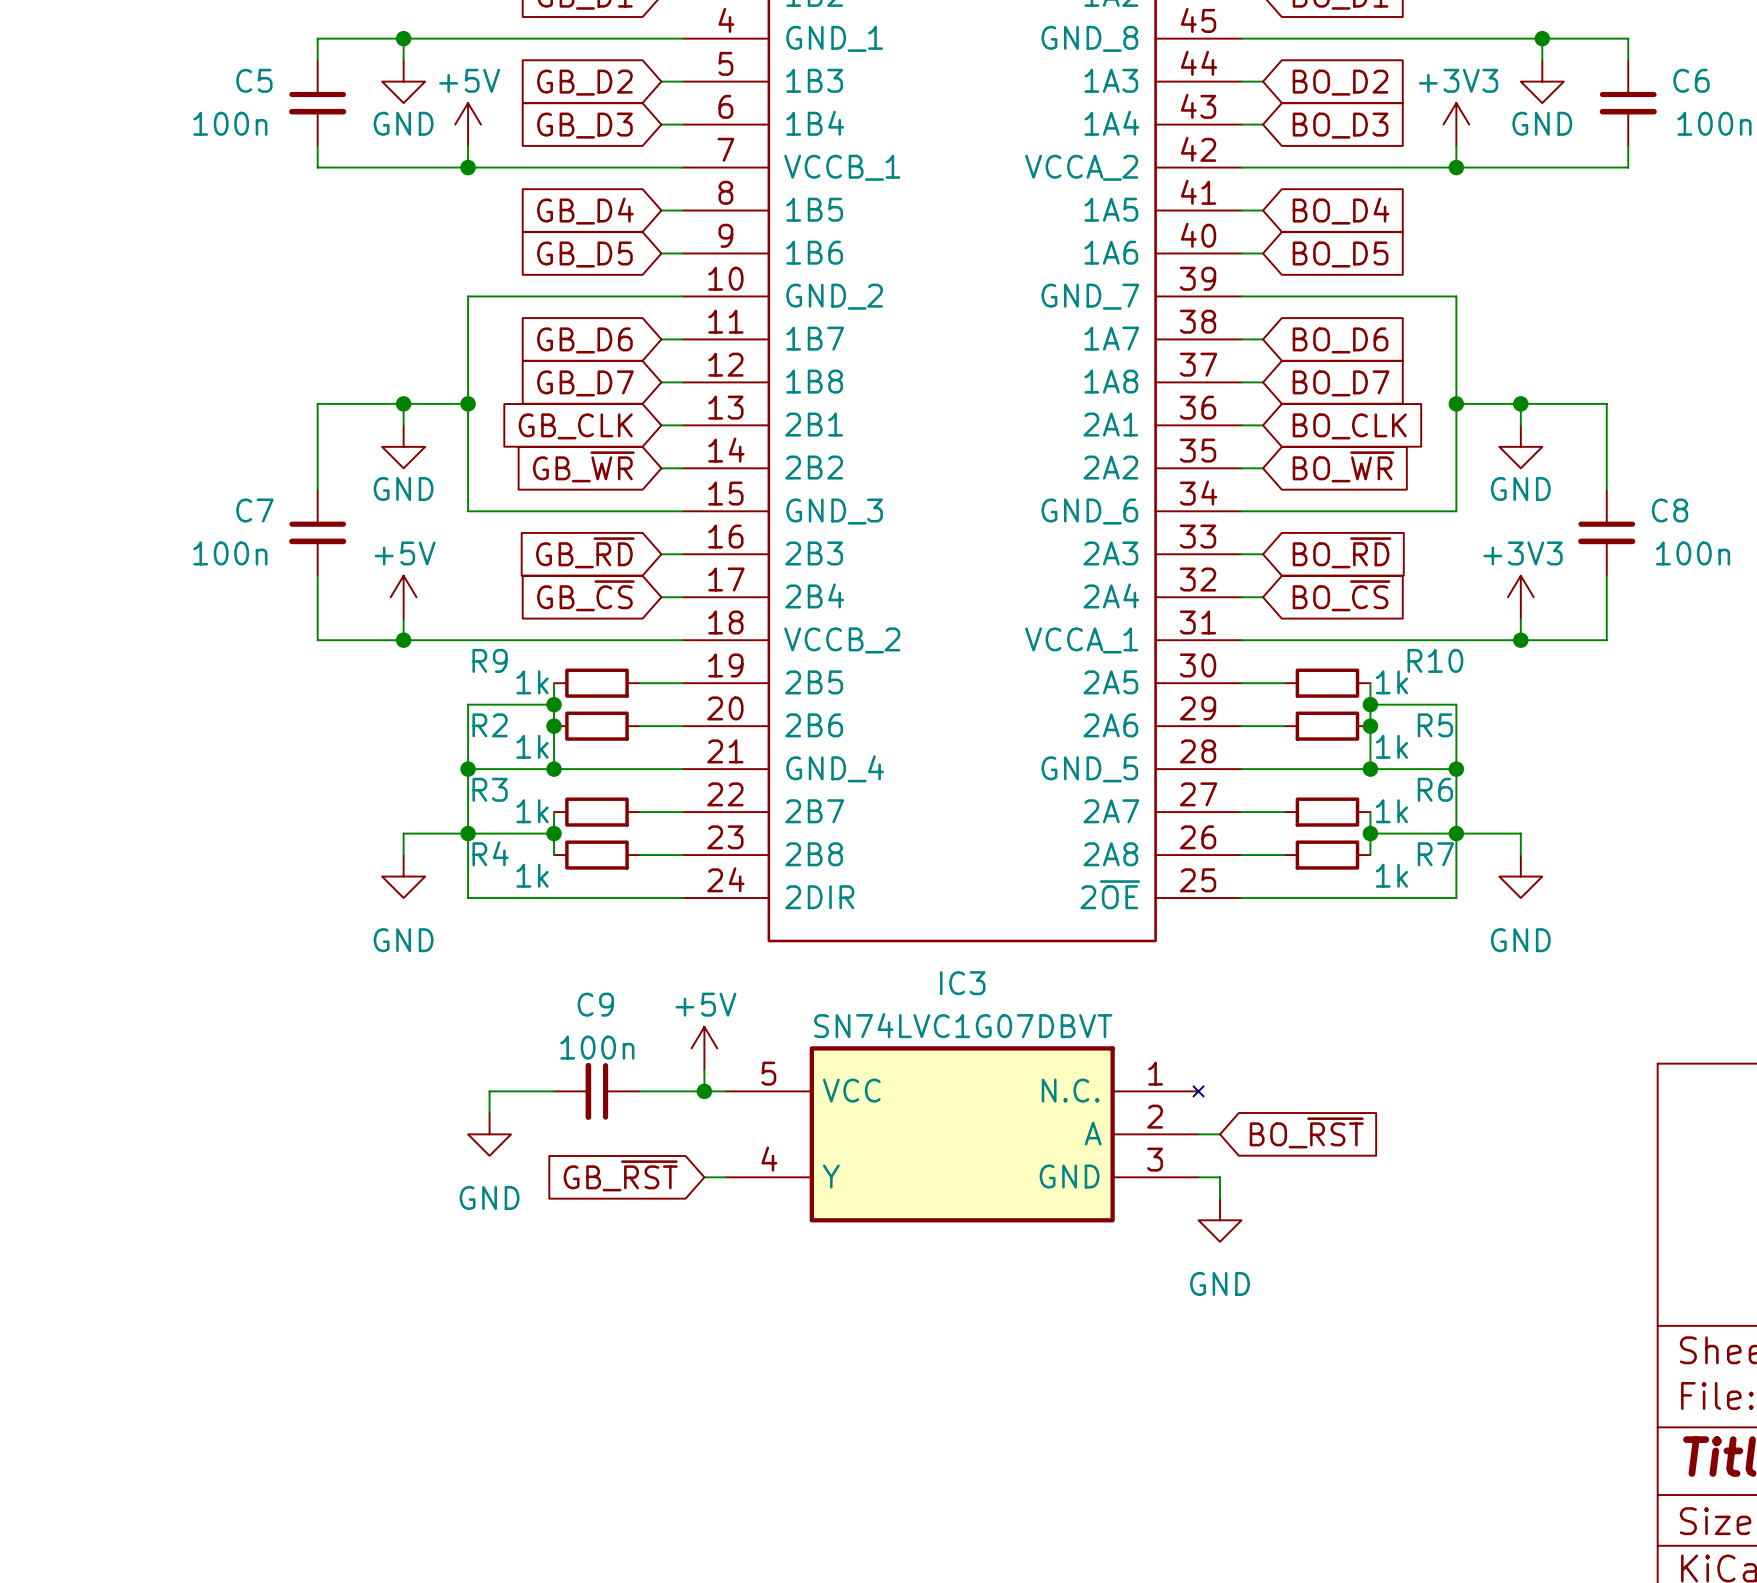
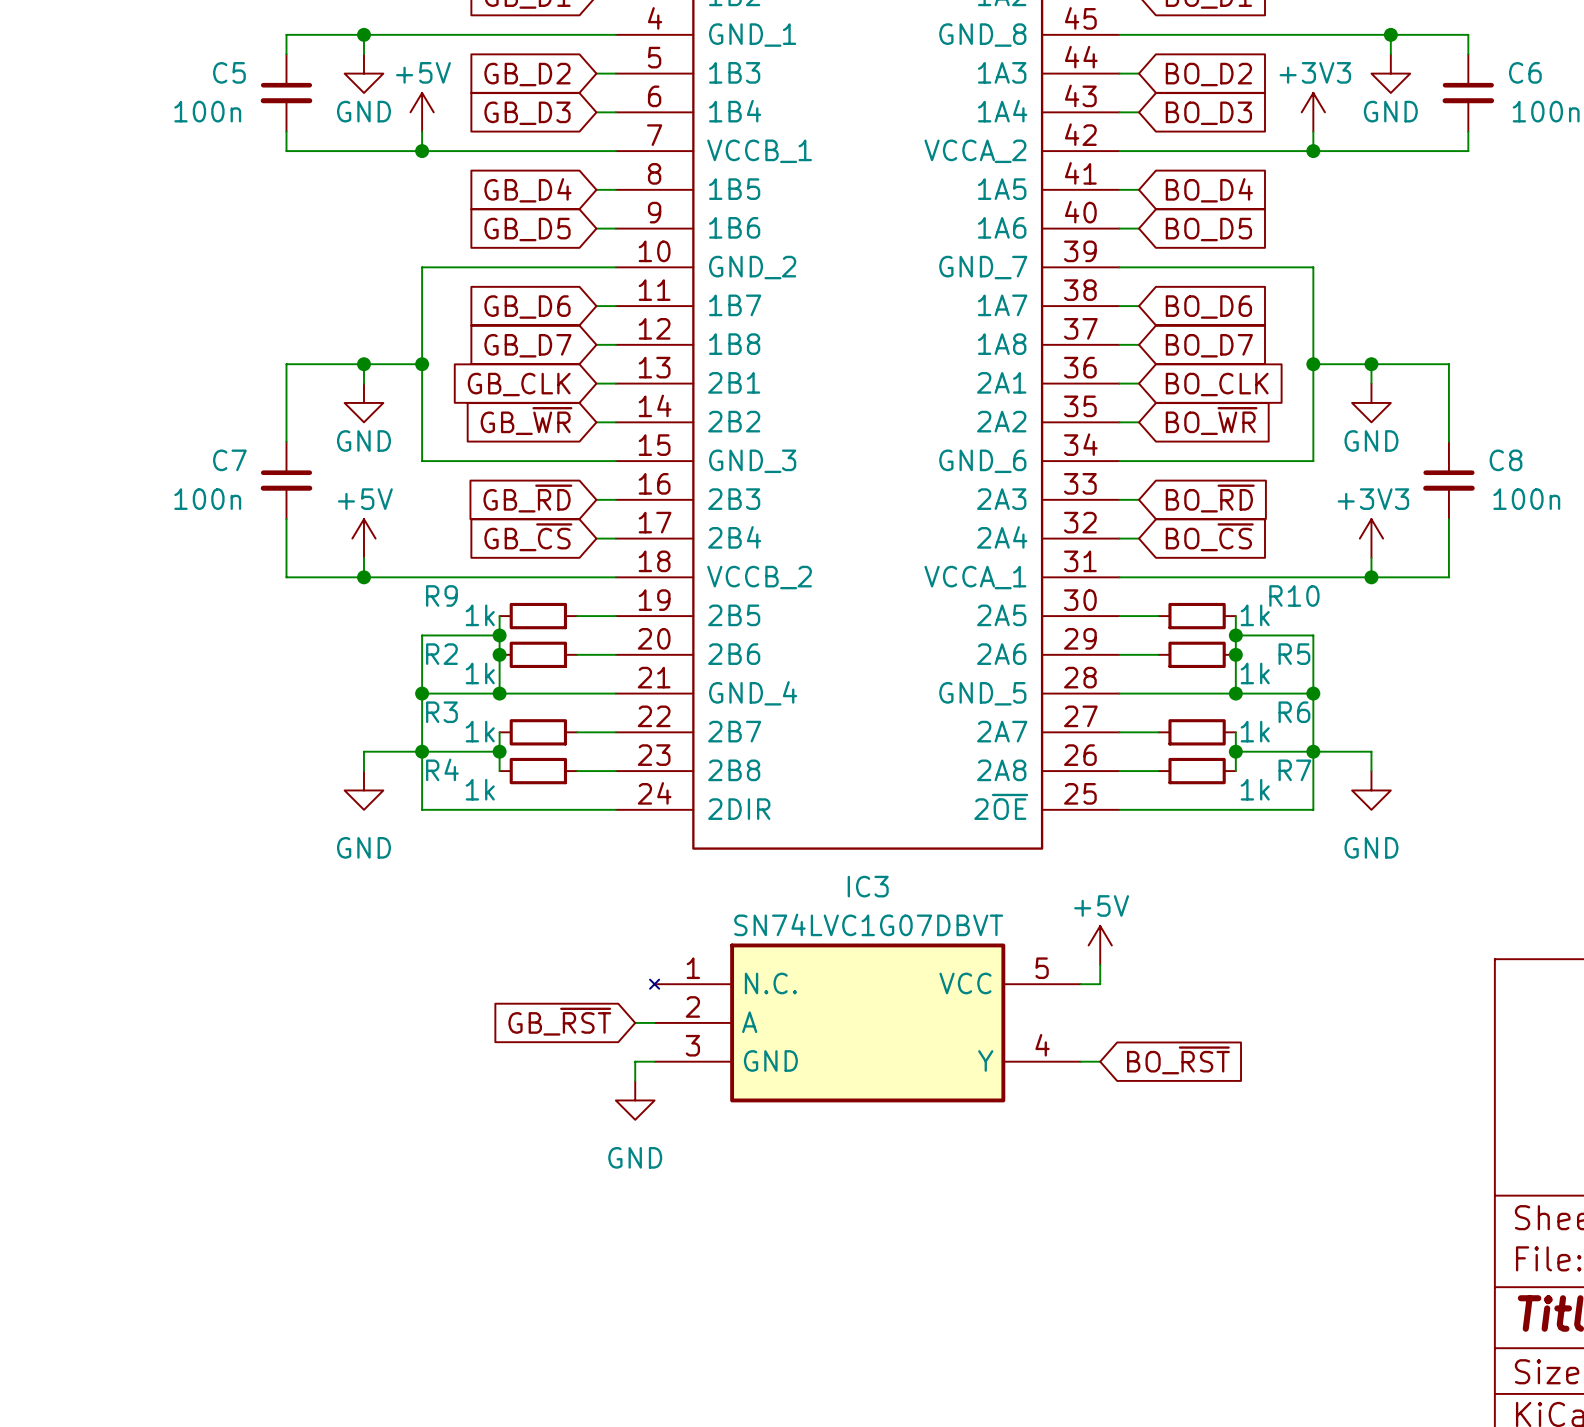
power symbol: +5V (704, 1048) -> none
power symbol: none -> +5V (1100, 945)
wire: (704, 1069) (704, 1091) -> (635, 1061) (635, 1081)
wire: none -> (1100, 964) (1100, 984) (1080, 984)
wire: (554, 1091) (489, 1091) (489, 1112) -> none
C9: 100n (596, 1091) -> none
wire: (639, 1091) (725, 1091) -> none
junction: (704, 1091) -> none
global label position: BO_~{RST} (1306, 1132) -> BO_~{RST} (1178, 1060)
power symbol position: GND (489, 1134) -> GND (635, 1100)
wire: none -> (635, 1022) (654, 1022)
IC3 flip: as is (1006, 1134) -> left-right (827, 1022)
wire: (1198, 1134) (1220, 1134) -> none
global label position: GB_~{RST} (620, 1175) -> GB_~{RST} (559, 1021)
wire: (1220, 1177) (1220, 1198) -> none
power symbol: GND (1220, 1220) -> none

